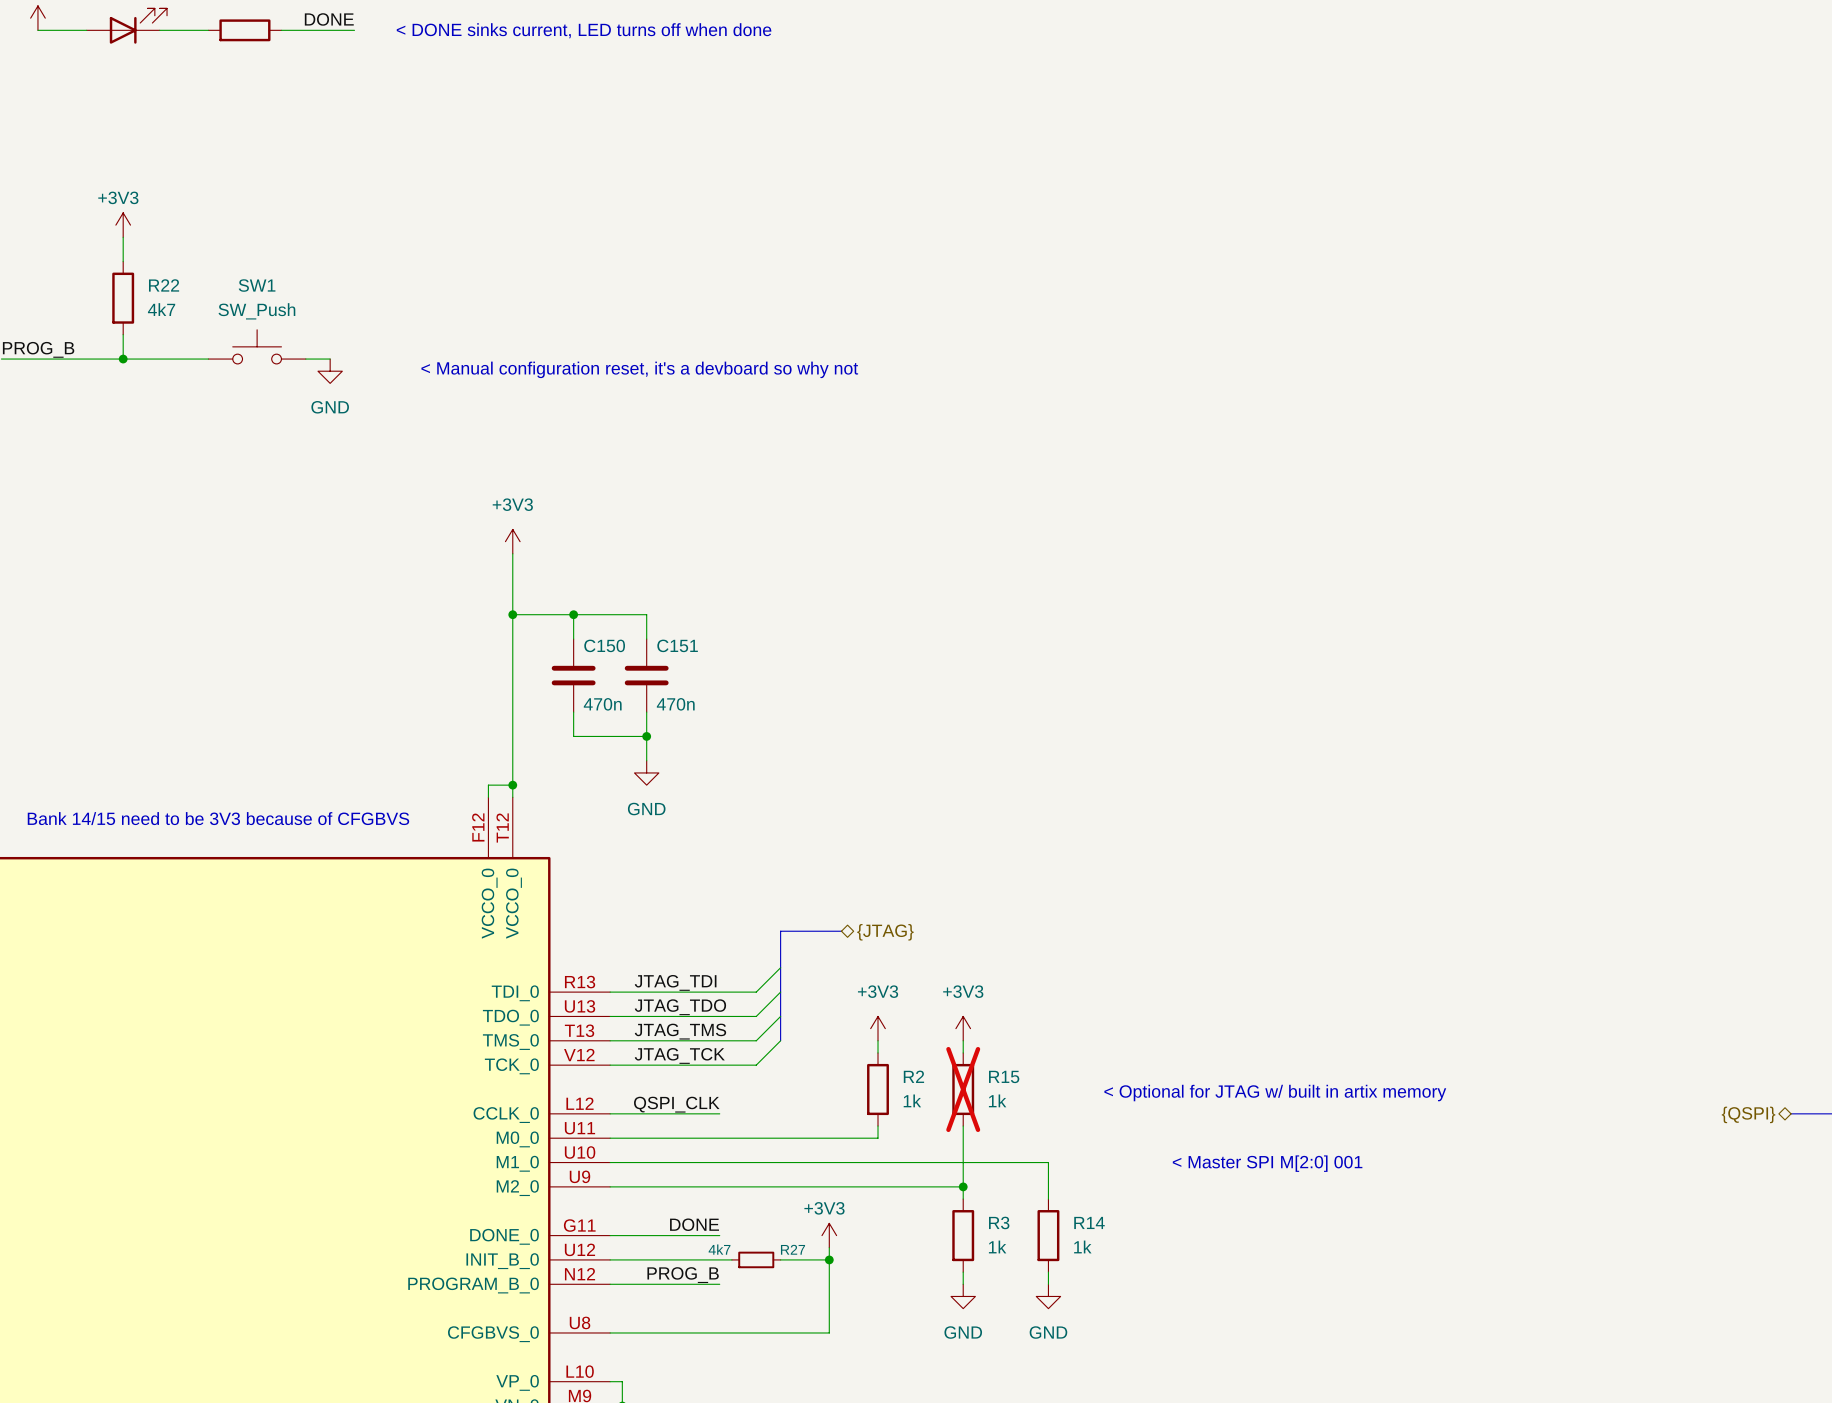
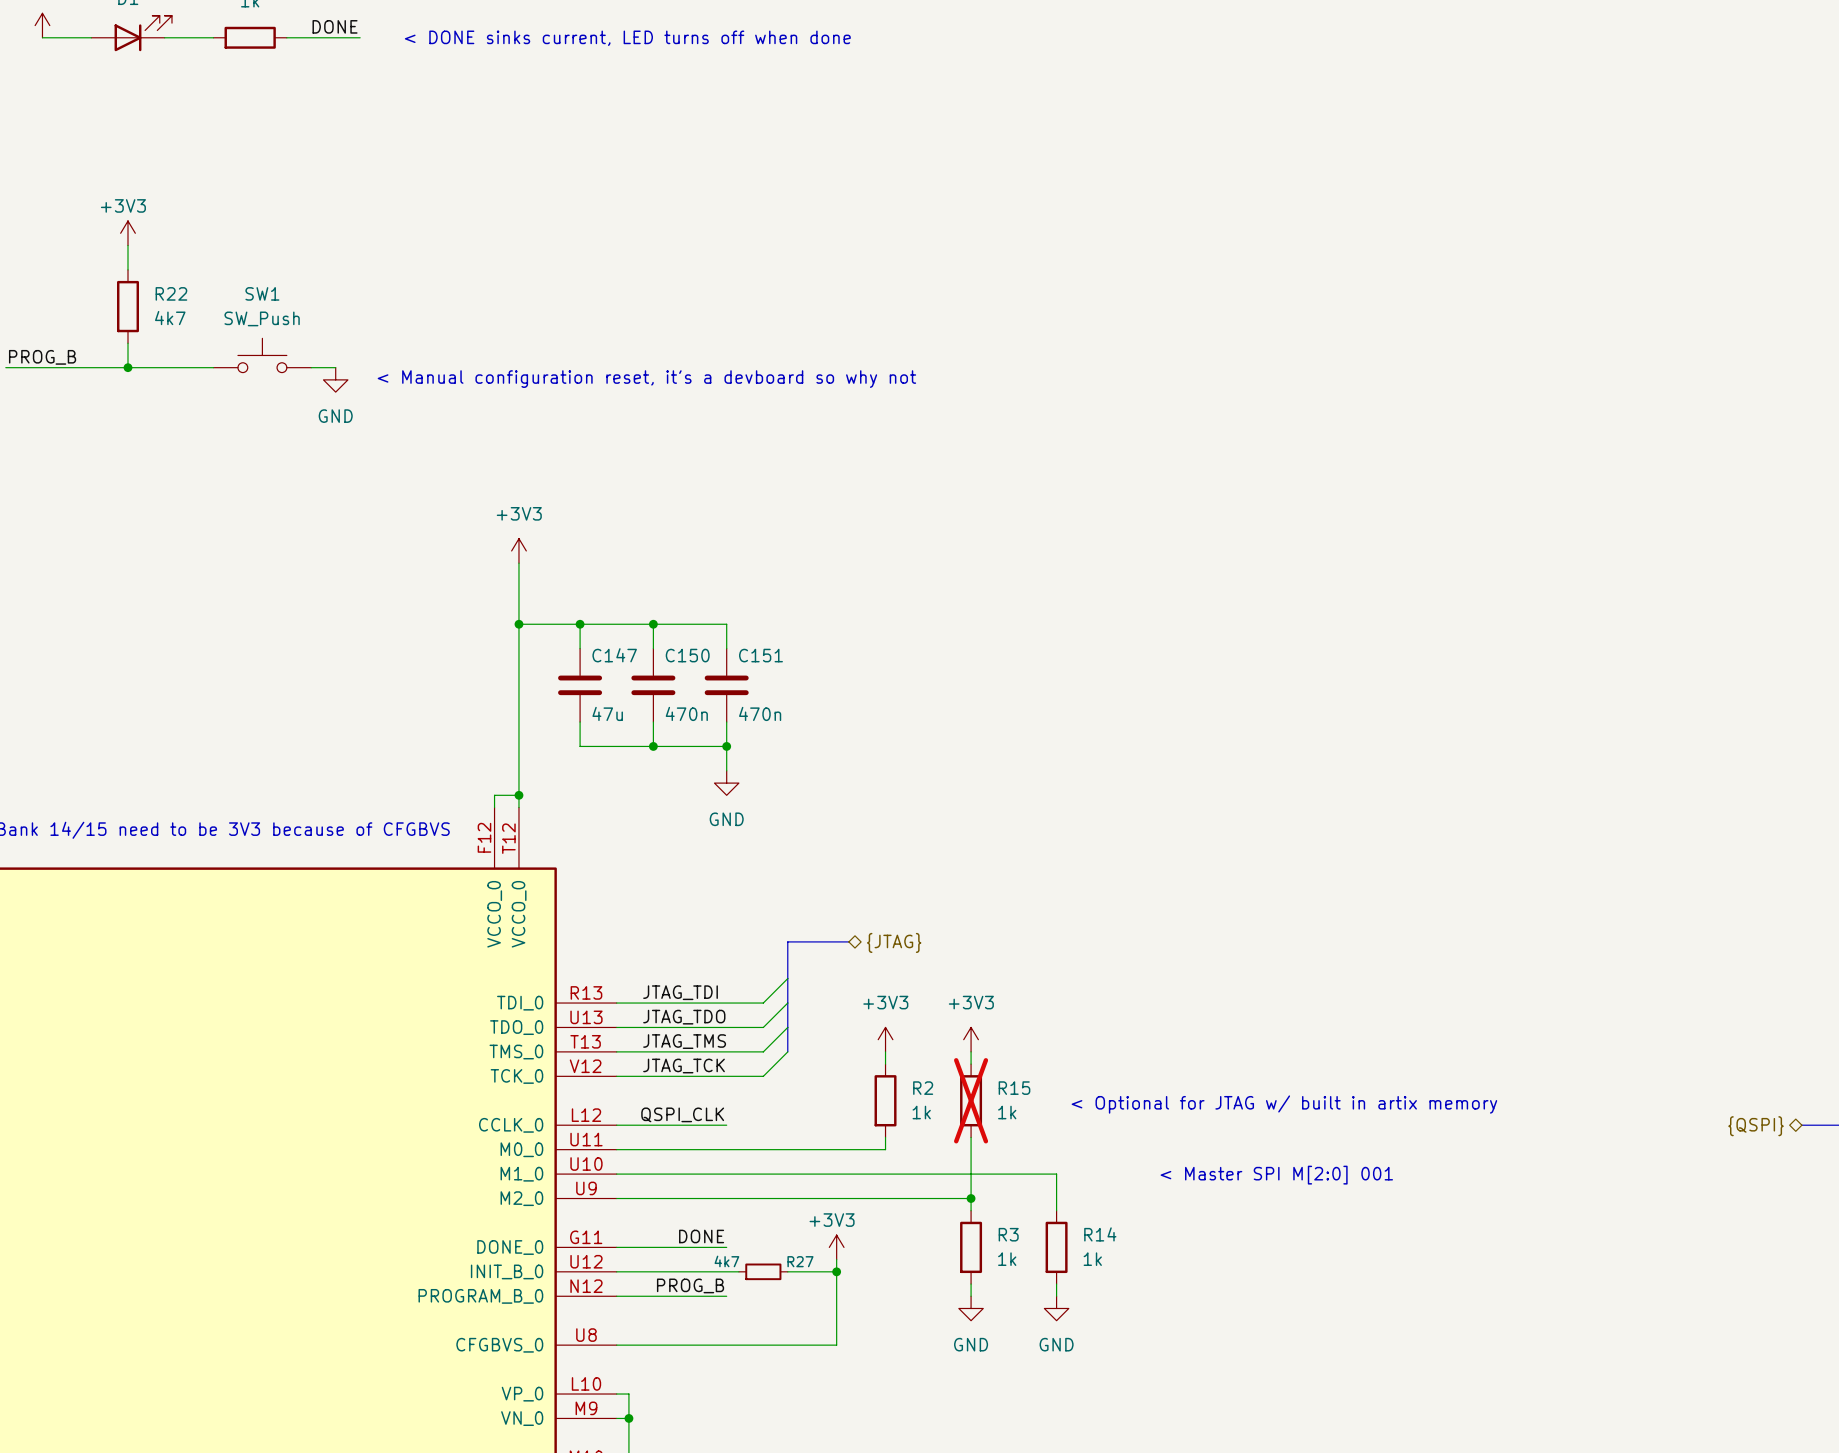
wire: none -> (653, 624) (726, 624) (726, 648)
junction: none -> (653, 624)
C150 name: C150 (604, 645) -> C147 (614, 655)
C151 name: C151 (677, 645) -> C150 (687, 655)
C151: none -> 470n (726, 685)
C150 value: 470n (602, 704) -> 47u (607, 713)
wire: none -> (726, 722) (726, 770)
wire: (646, 736) (646, 760) -> (653, 746) (726, 746)
junction: none -> (726, 746)
power symbol position: GND (646, 772) -> GND (726, 783)

